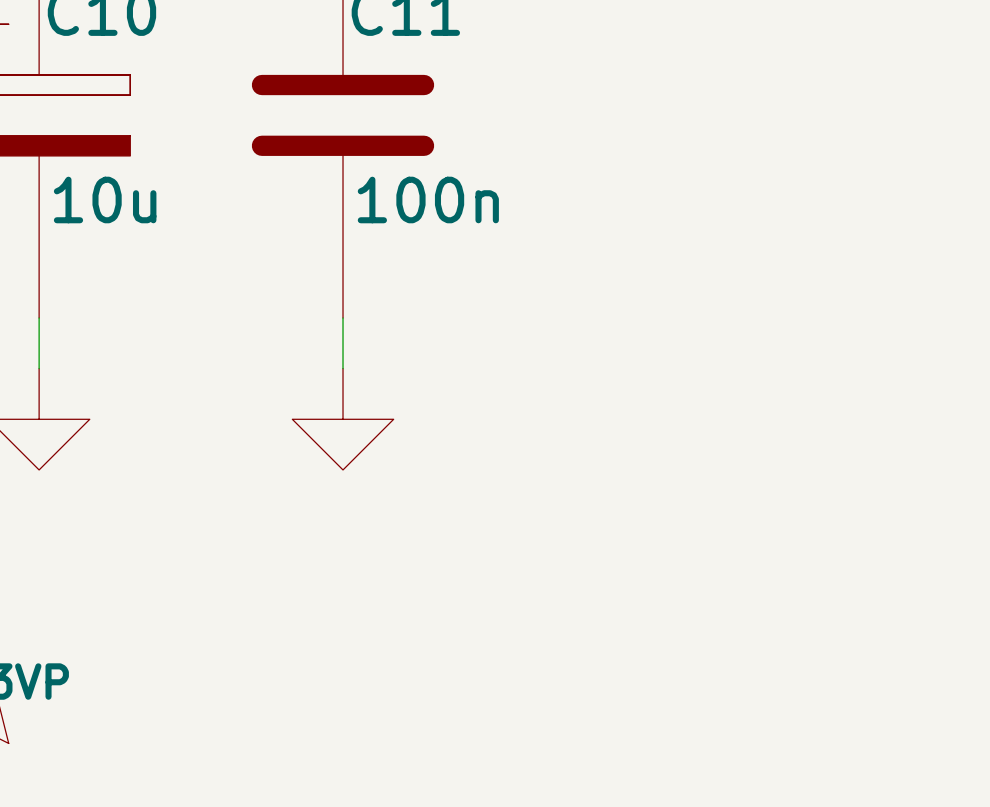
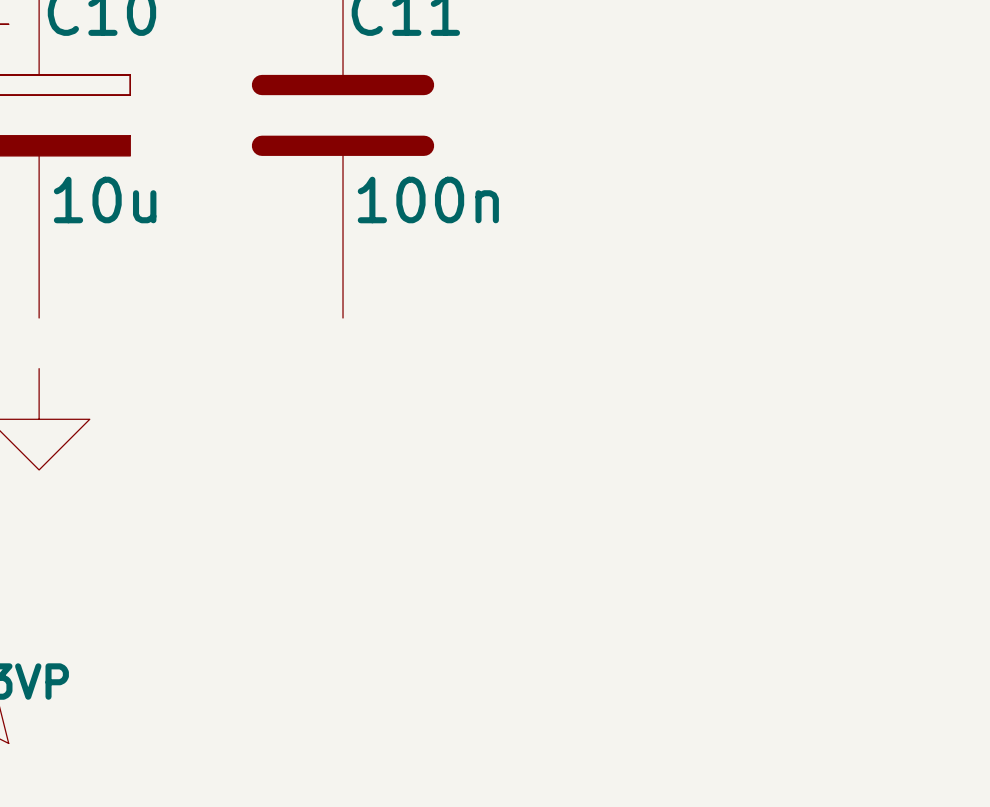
wire: (39, 318) (39, 368) -> none
wire: (343, 318) (343, 368) -> none
power symbol: (343, 419) -> none

